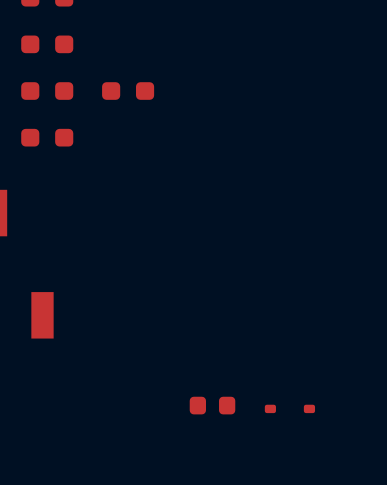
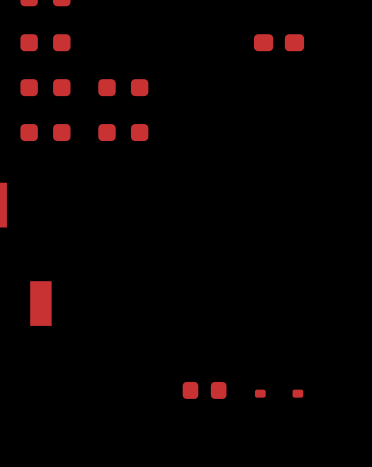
part: none -> (279, 42)
part: none -> (123, 132)

